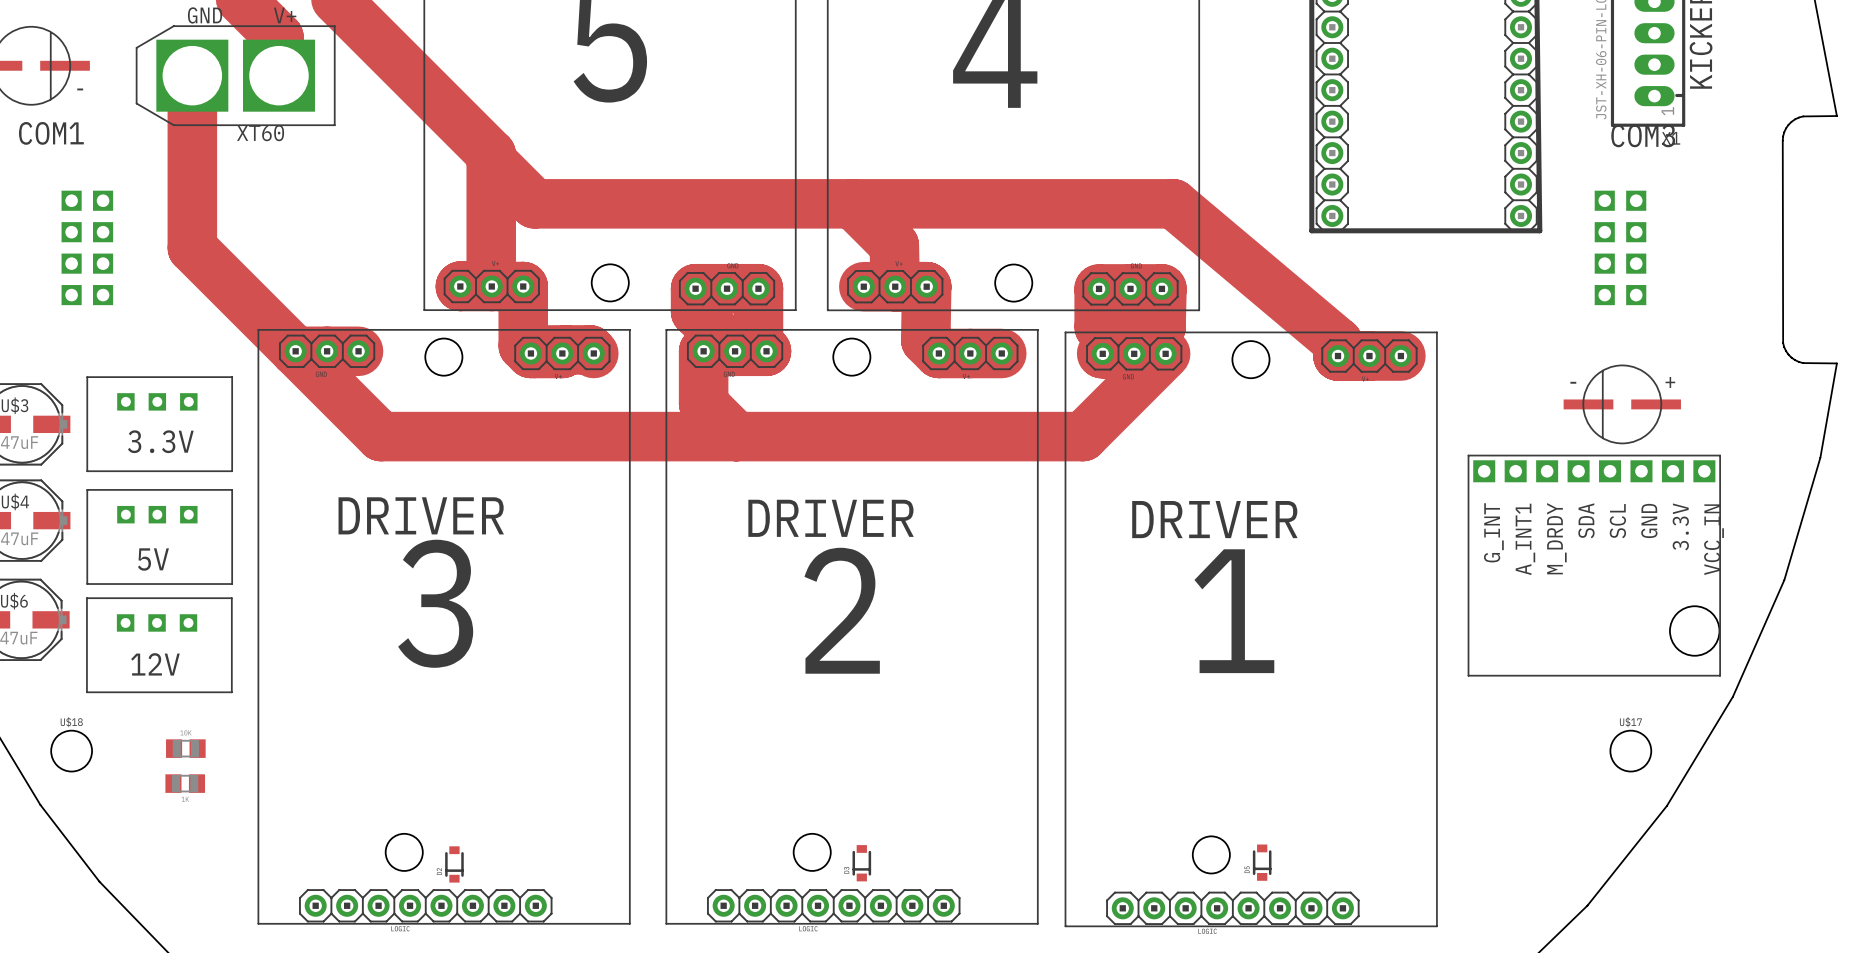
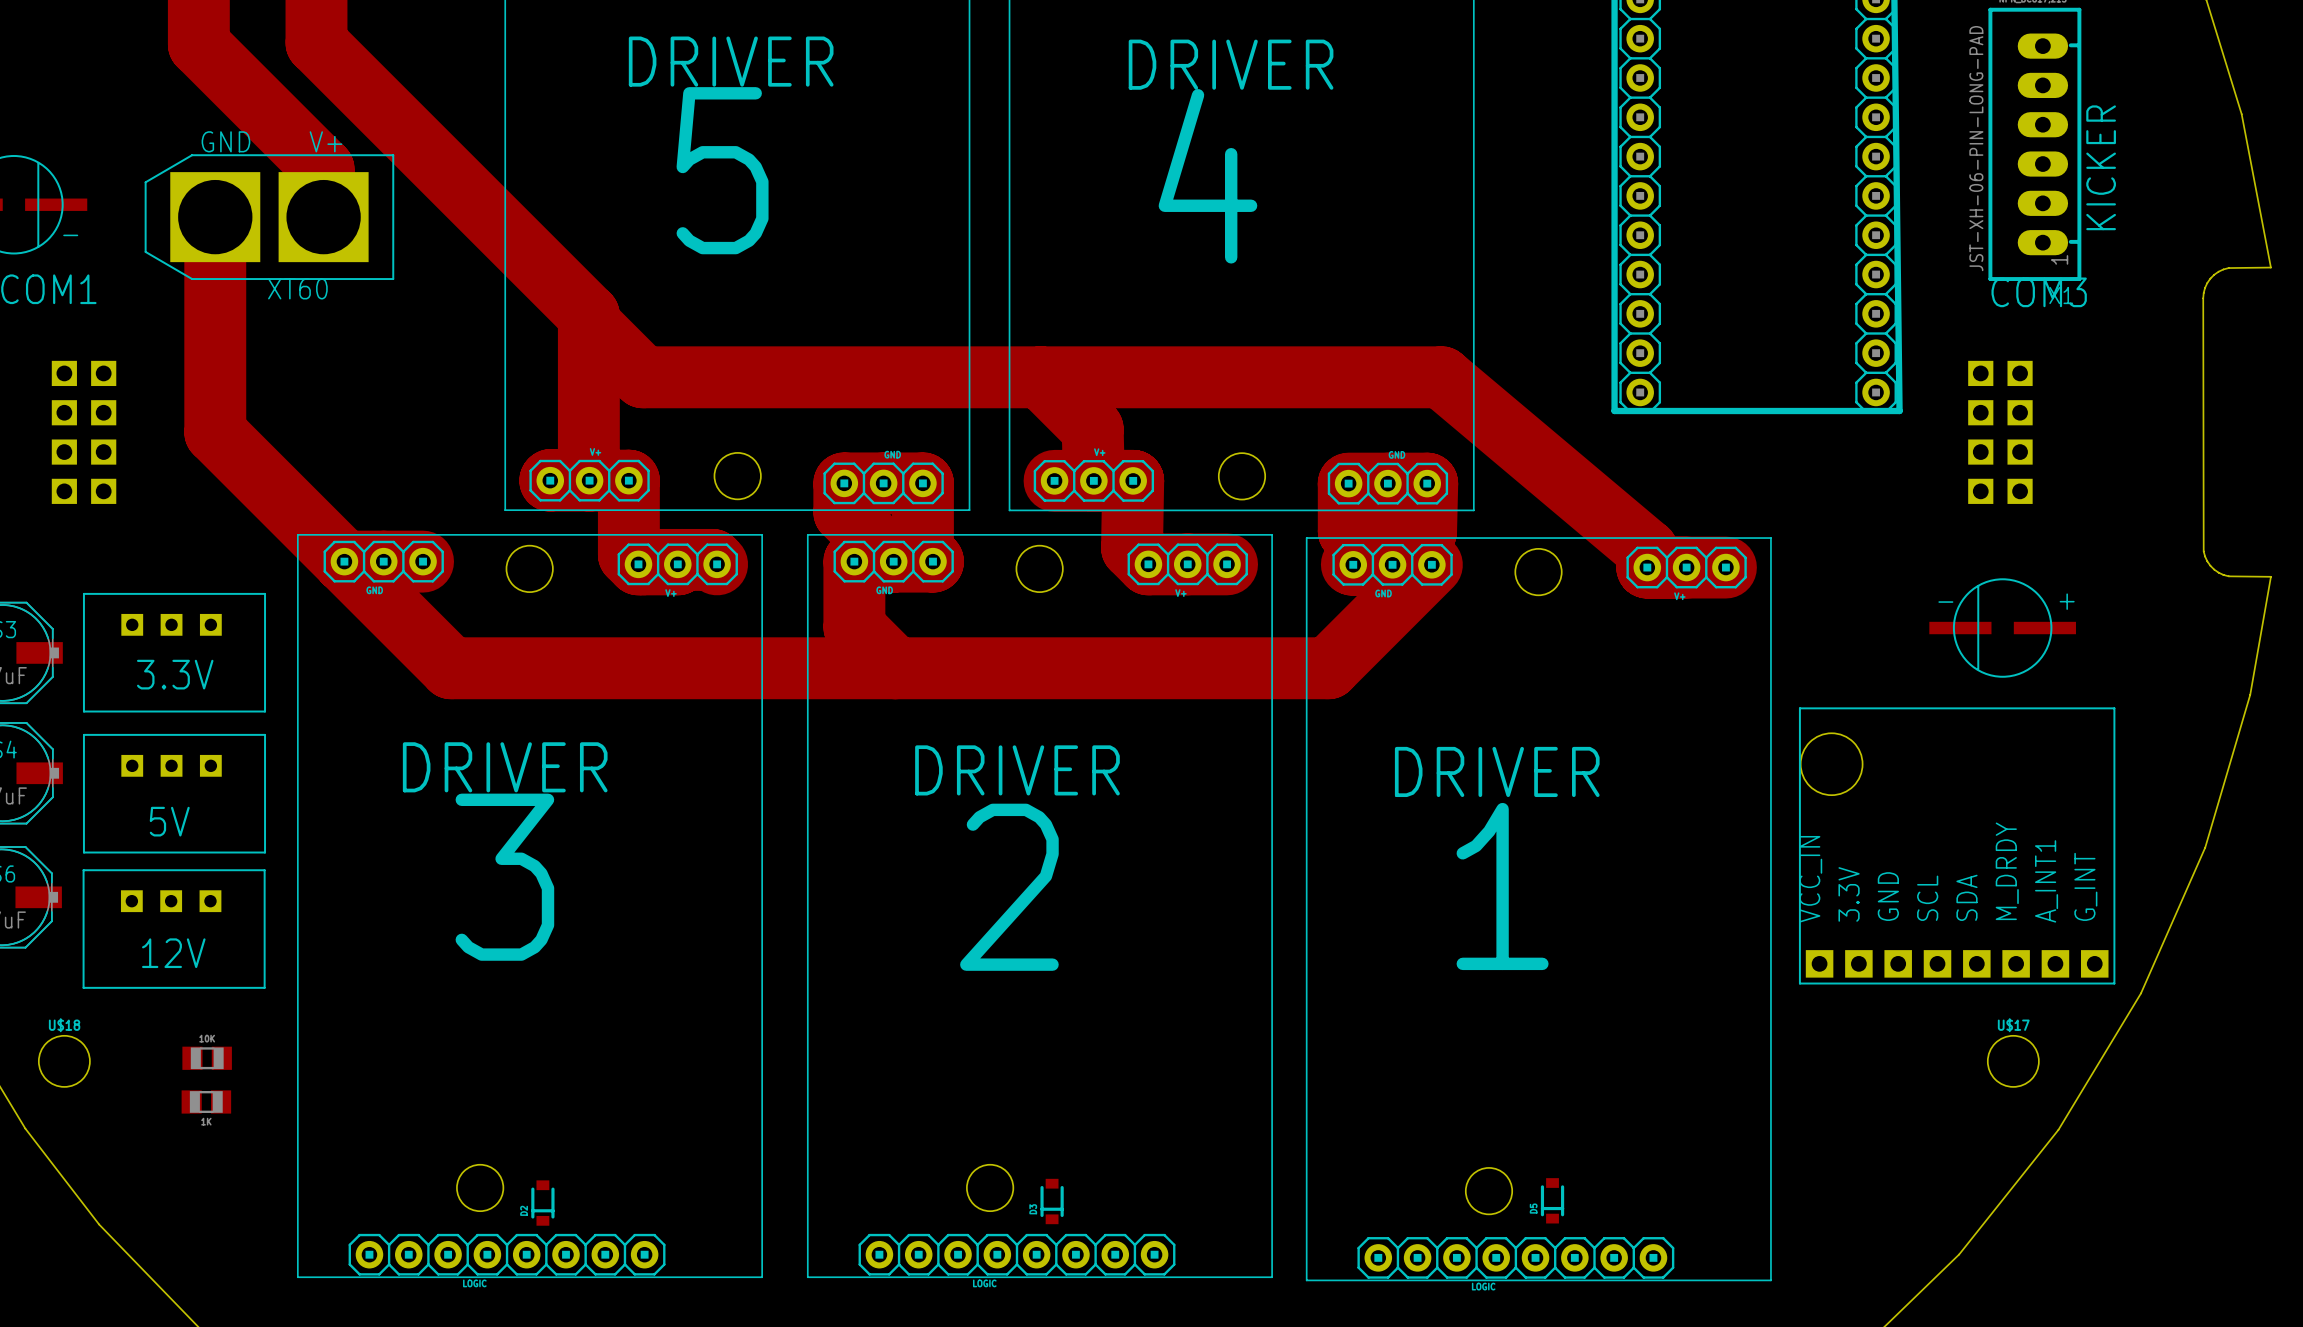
part: (1594, 565) -> none
part: none -> (1957, 845)

